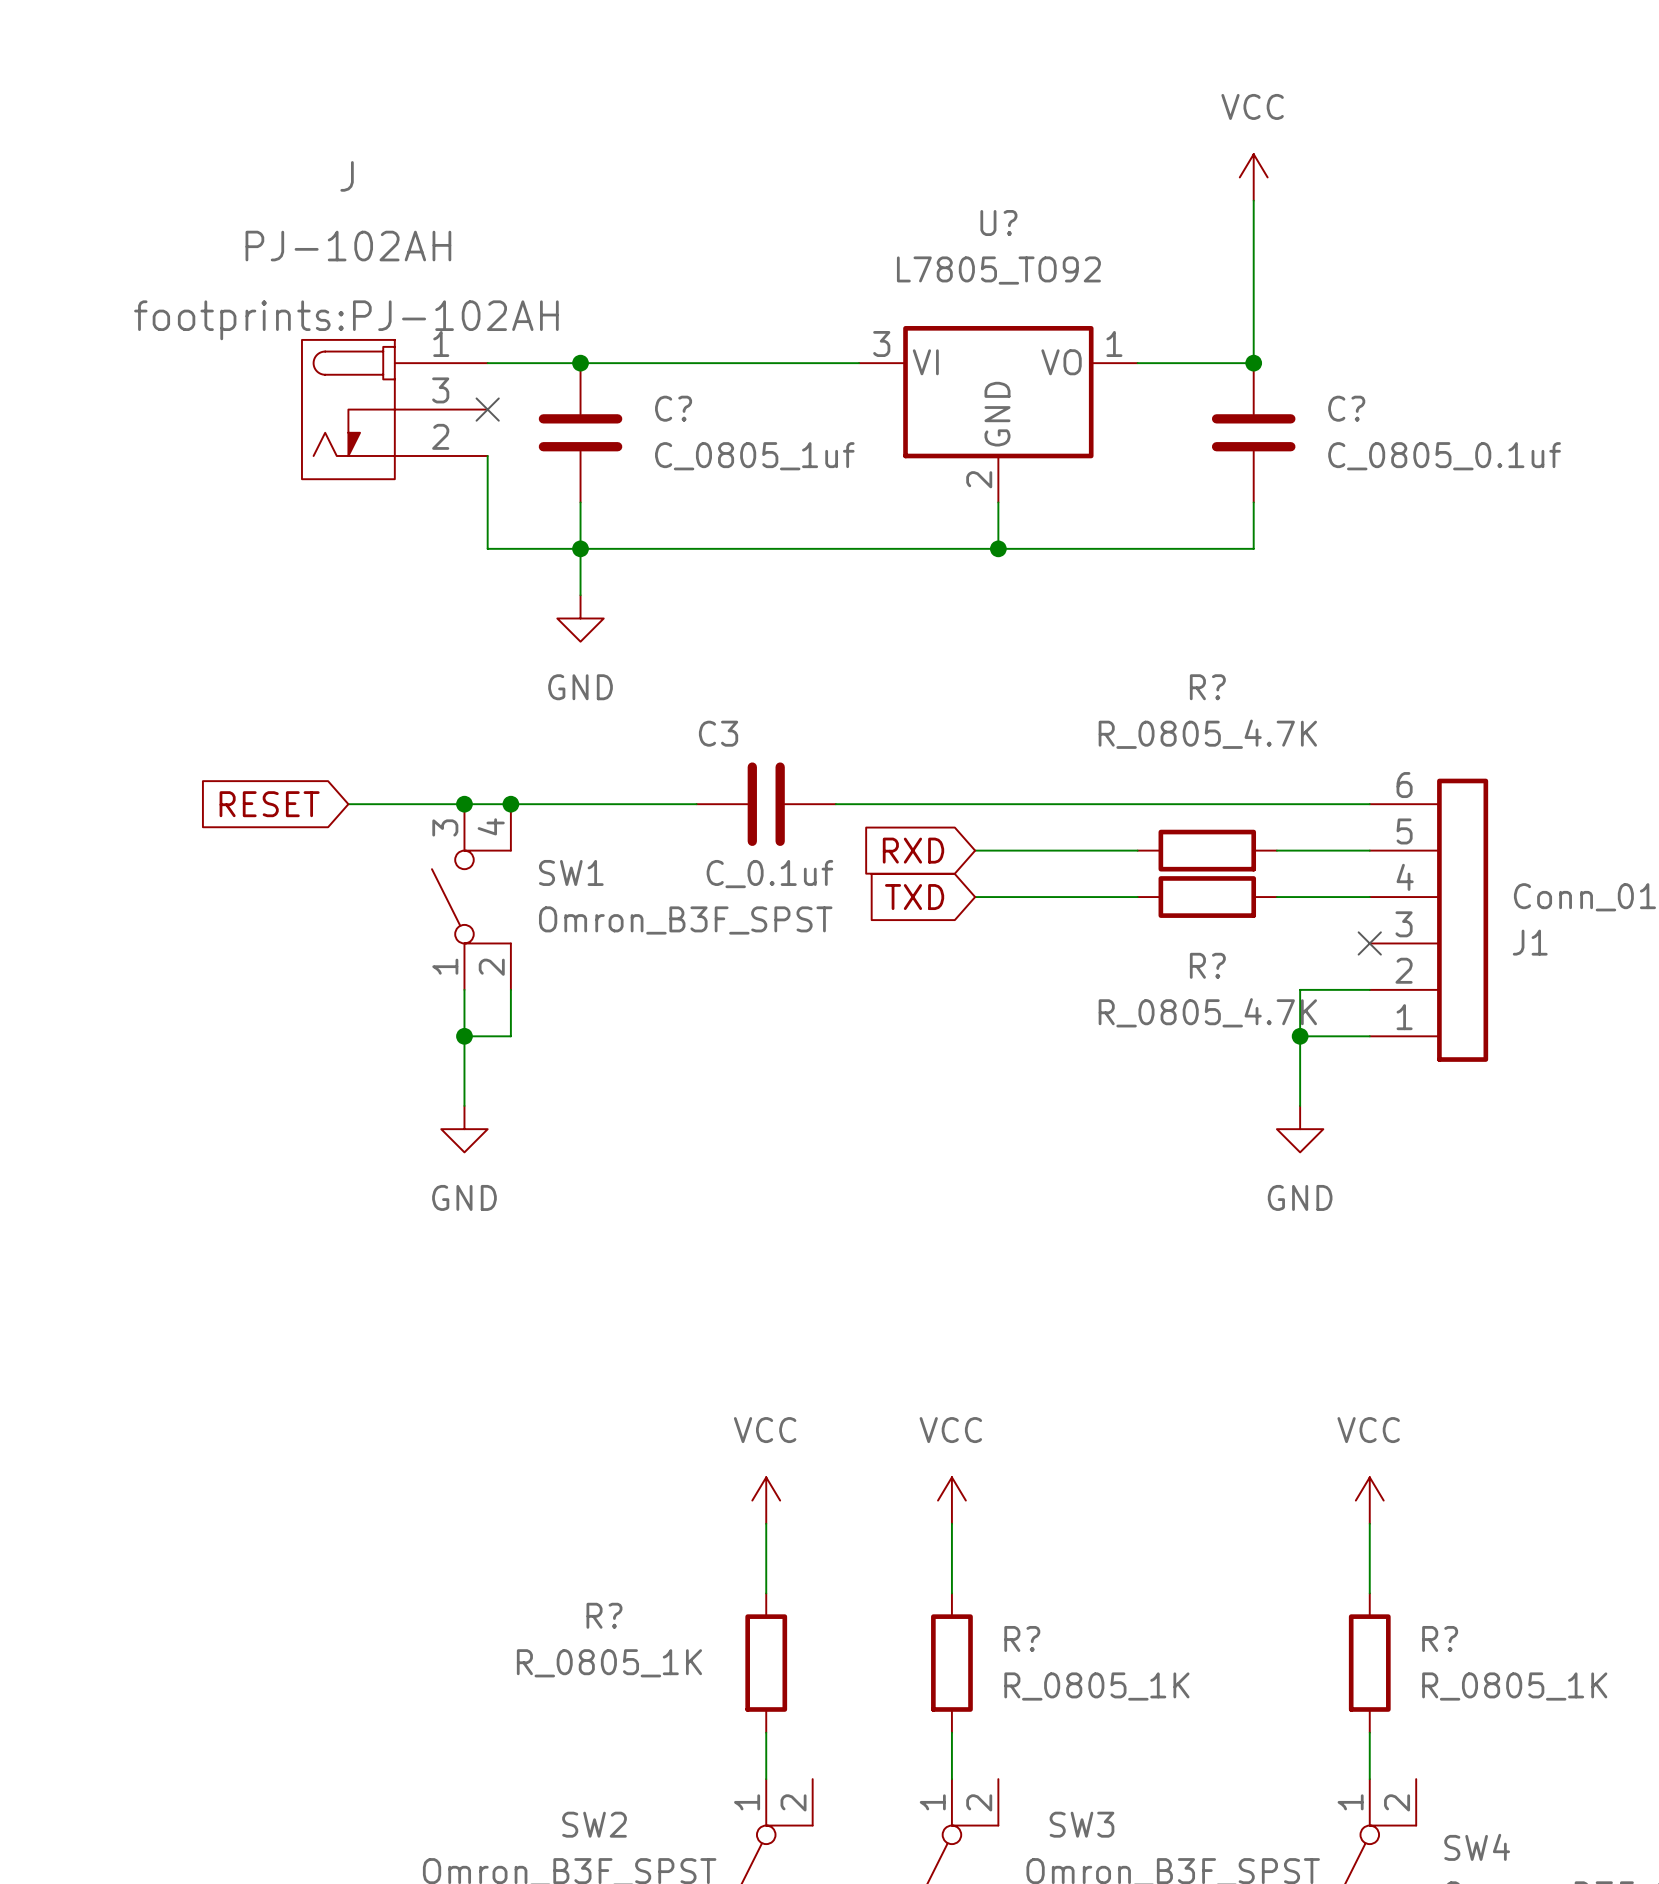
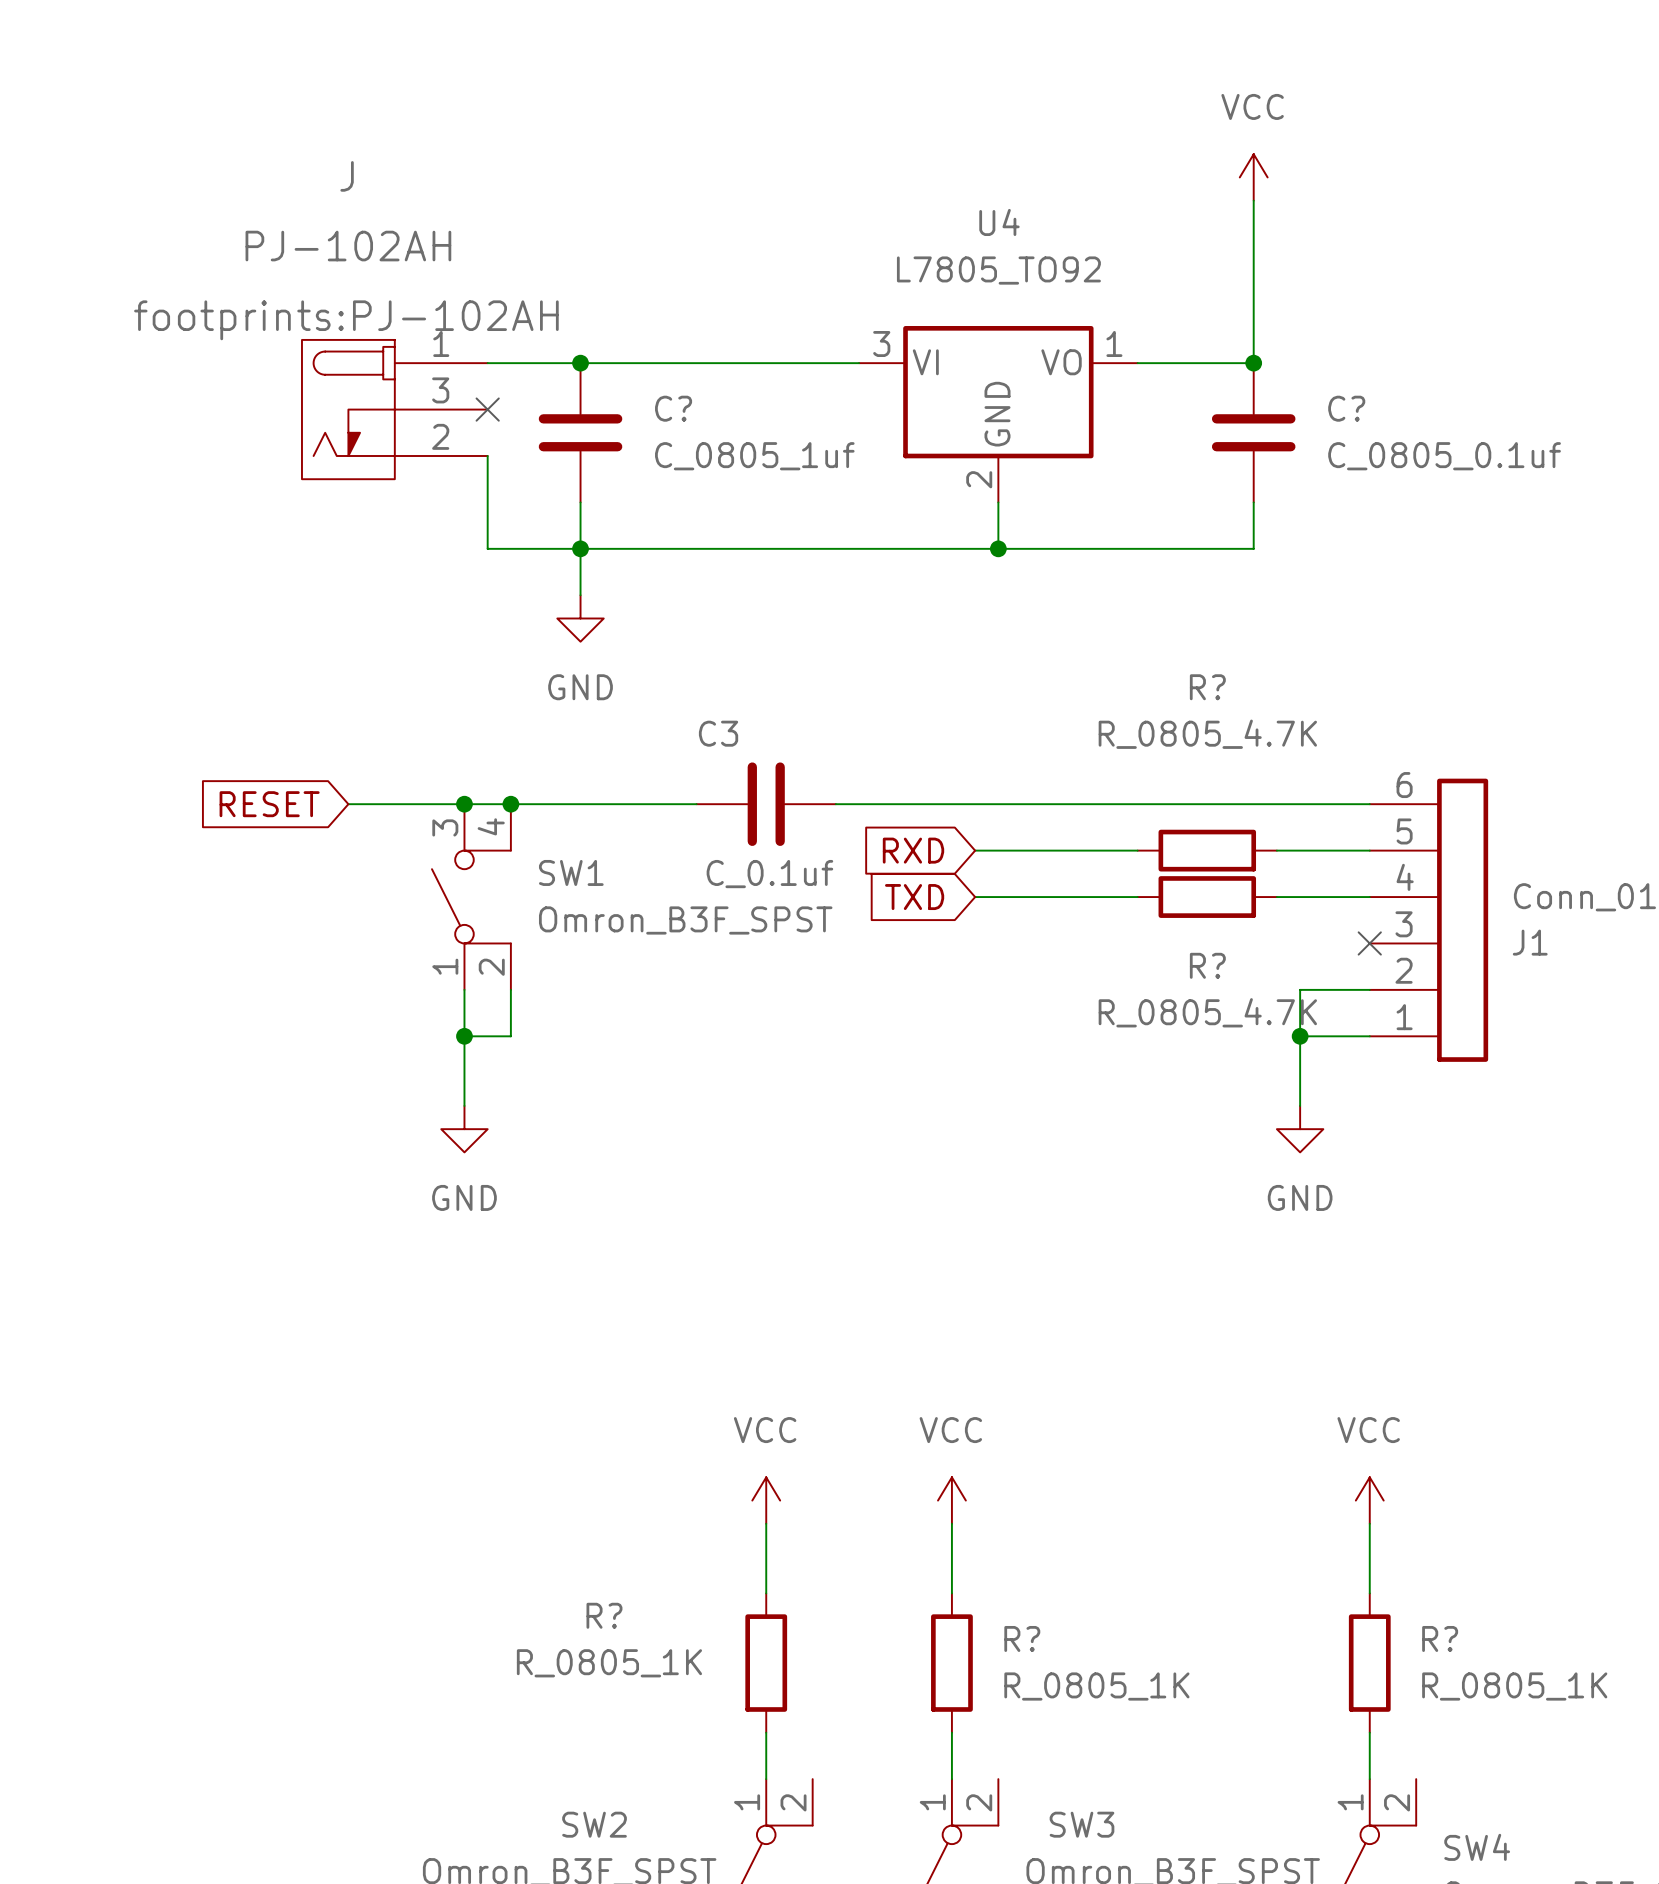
U? name: U? (998, 223) -> U4 (999, 222)

